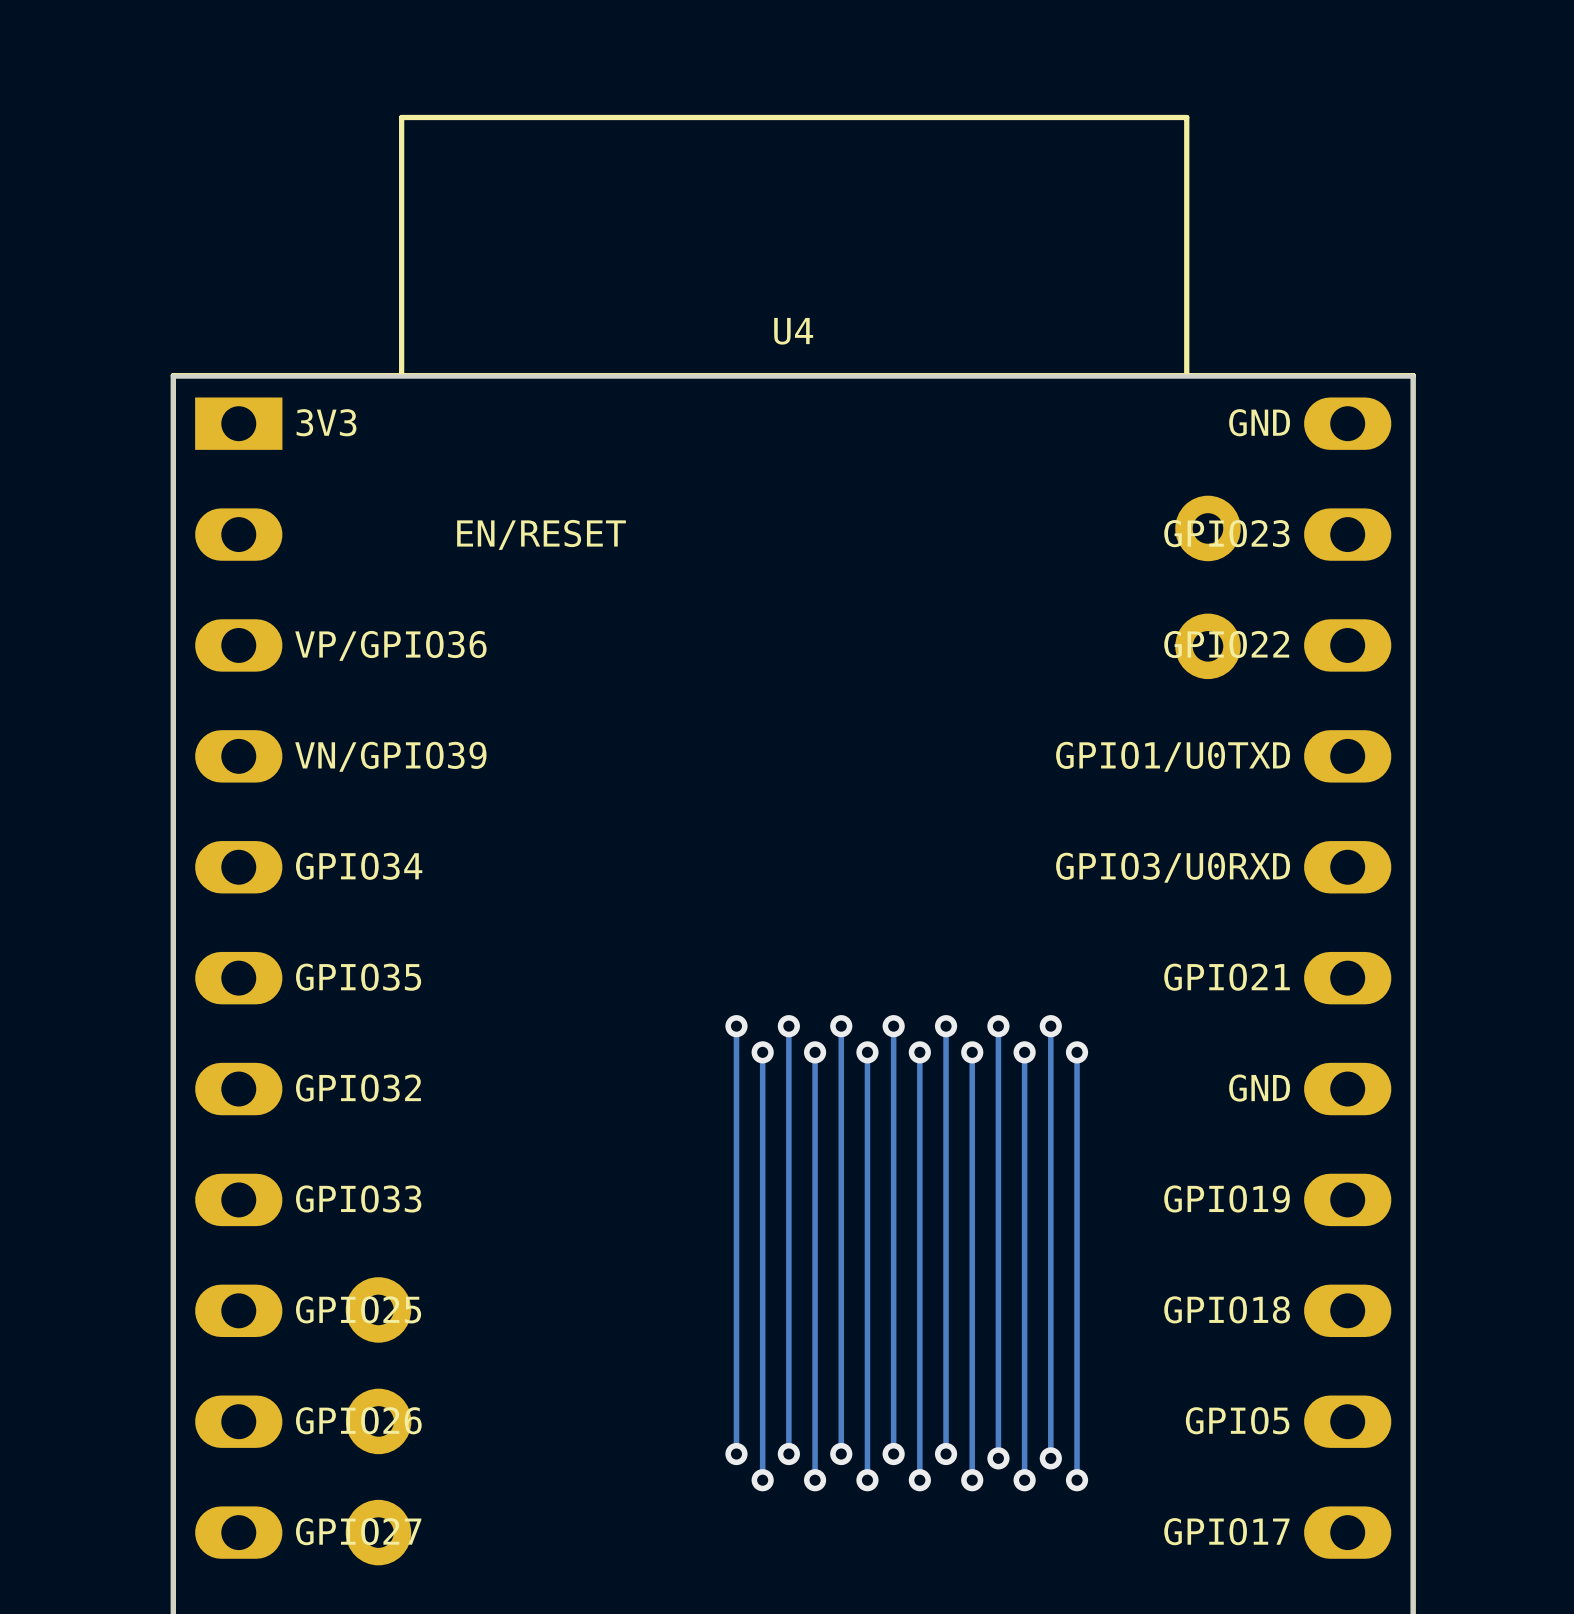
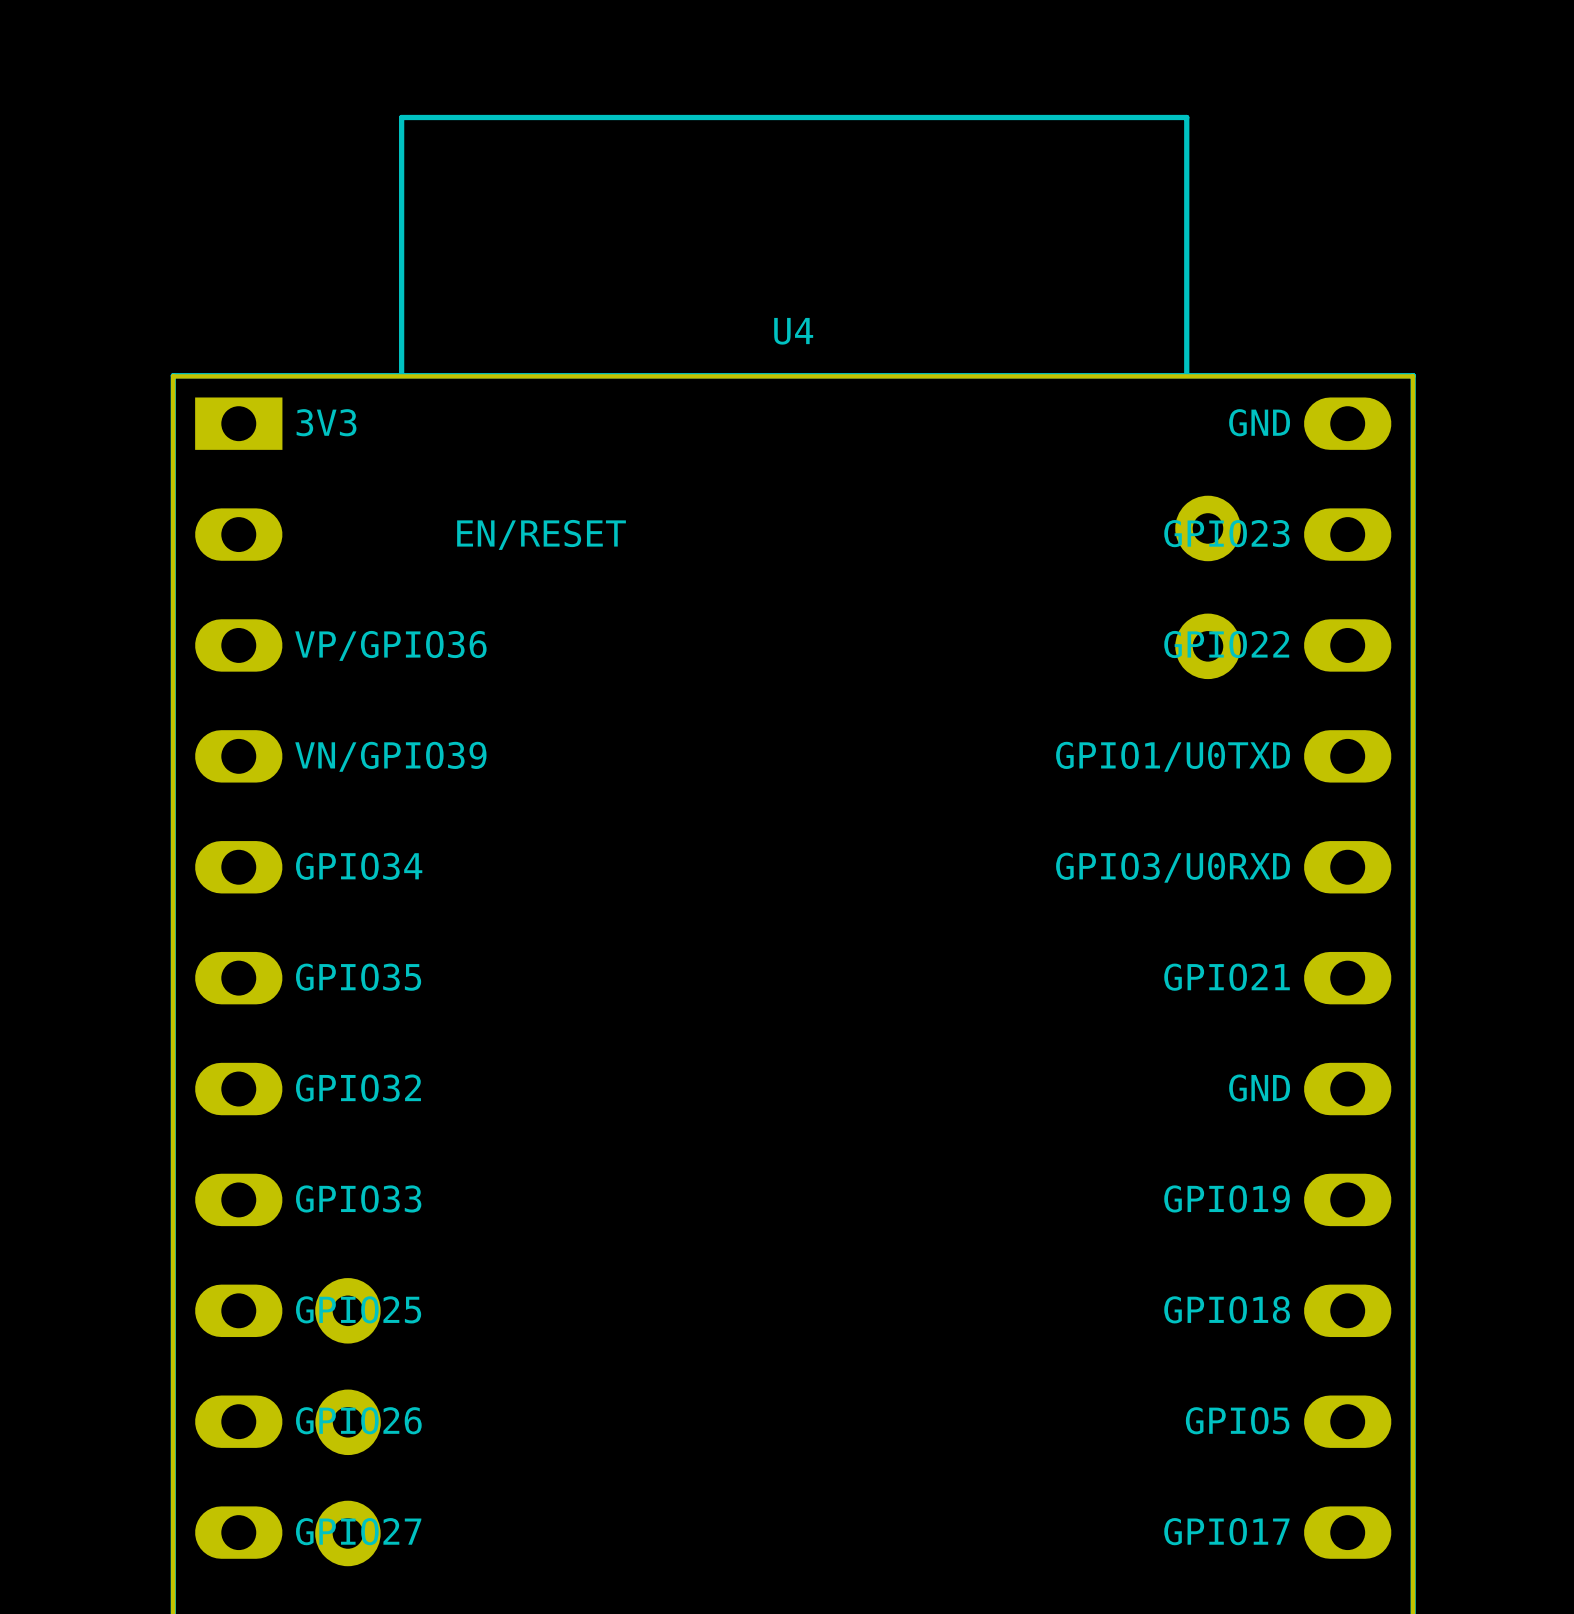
track: (736, 1026) (736, 1454) -> none
via: (736, 1026) -> none
track: (788, 1026) (788, 1454) -> none
via: (788, 1026) -> none
track: (841, 1026) (841, 1454) -> none
via: (841, 1026) -> none
track: (893, 1026) (893, 1454) -> none
via: (893, 1026) -> none
track: (946, 1026) (946, 1454) -> none
via: (946, 1026) -> none
track: (998, 1026) (998, 1458) -> none
via: (998, 1026) -> none
track: (1050, 1026) (1050, 1458) -> none
via: (1050, 1026) -> none
track: (762, 1052) (762, 1480) -> none
via: (762, 1052) -> none
track: (815, 1052) (815, 1480) -> none
via: (815, 1052) -> none
track: (867, 1052) (867, 1480) -> none
via: (867, 1052) -> none
track: (919, 1052) (919, 1480) -> none
via: (919, 1052) -> none
track: (972, 1052) (972, 1480) -> none
via: (972, 1052) -> none
track: (1024, 1052) (1024, 1480) -> none
via: (1024, 1052) -> none
track: (1077, 1052) (1077, 1480) -> none
via: (1077, 1052) -> none
part position: (378, 1309) -> (347, 1310)
part position: (378, 1421) -> (348, 1422)
via: (736, 1454) -> none
via: (788, 1454) -> none
via: (841, 1454) -> none
via: (893, 1454) -> none
via: (946, 1454) -> none
via: (998, 1458) -> none
via: (1050, 1458) -> none
via: (762, 1480) -> none
via: (815, 1480) -> none
via: (867, 1480) -> none
via: (919, 1480) -> none
via: (972, 1480) -> none
via: (1024, 1480) -> none
via: (1077, 1480) -> none
part position: (378, 1532) -> (347, 1533)

